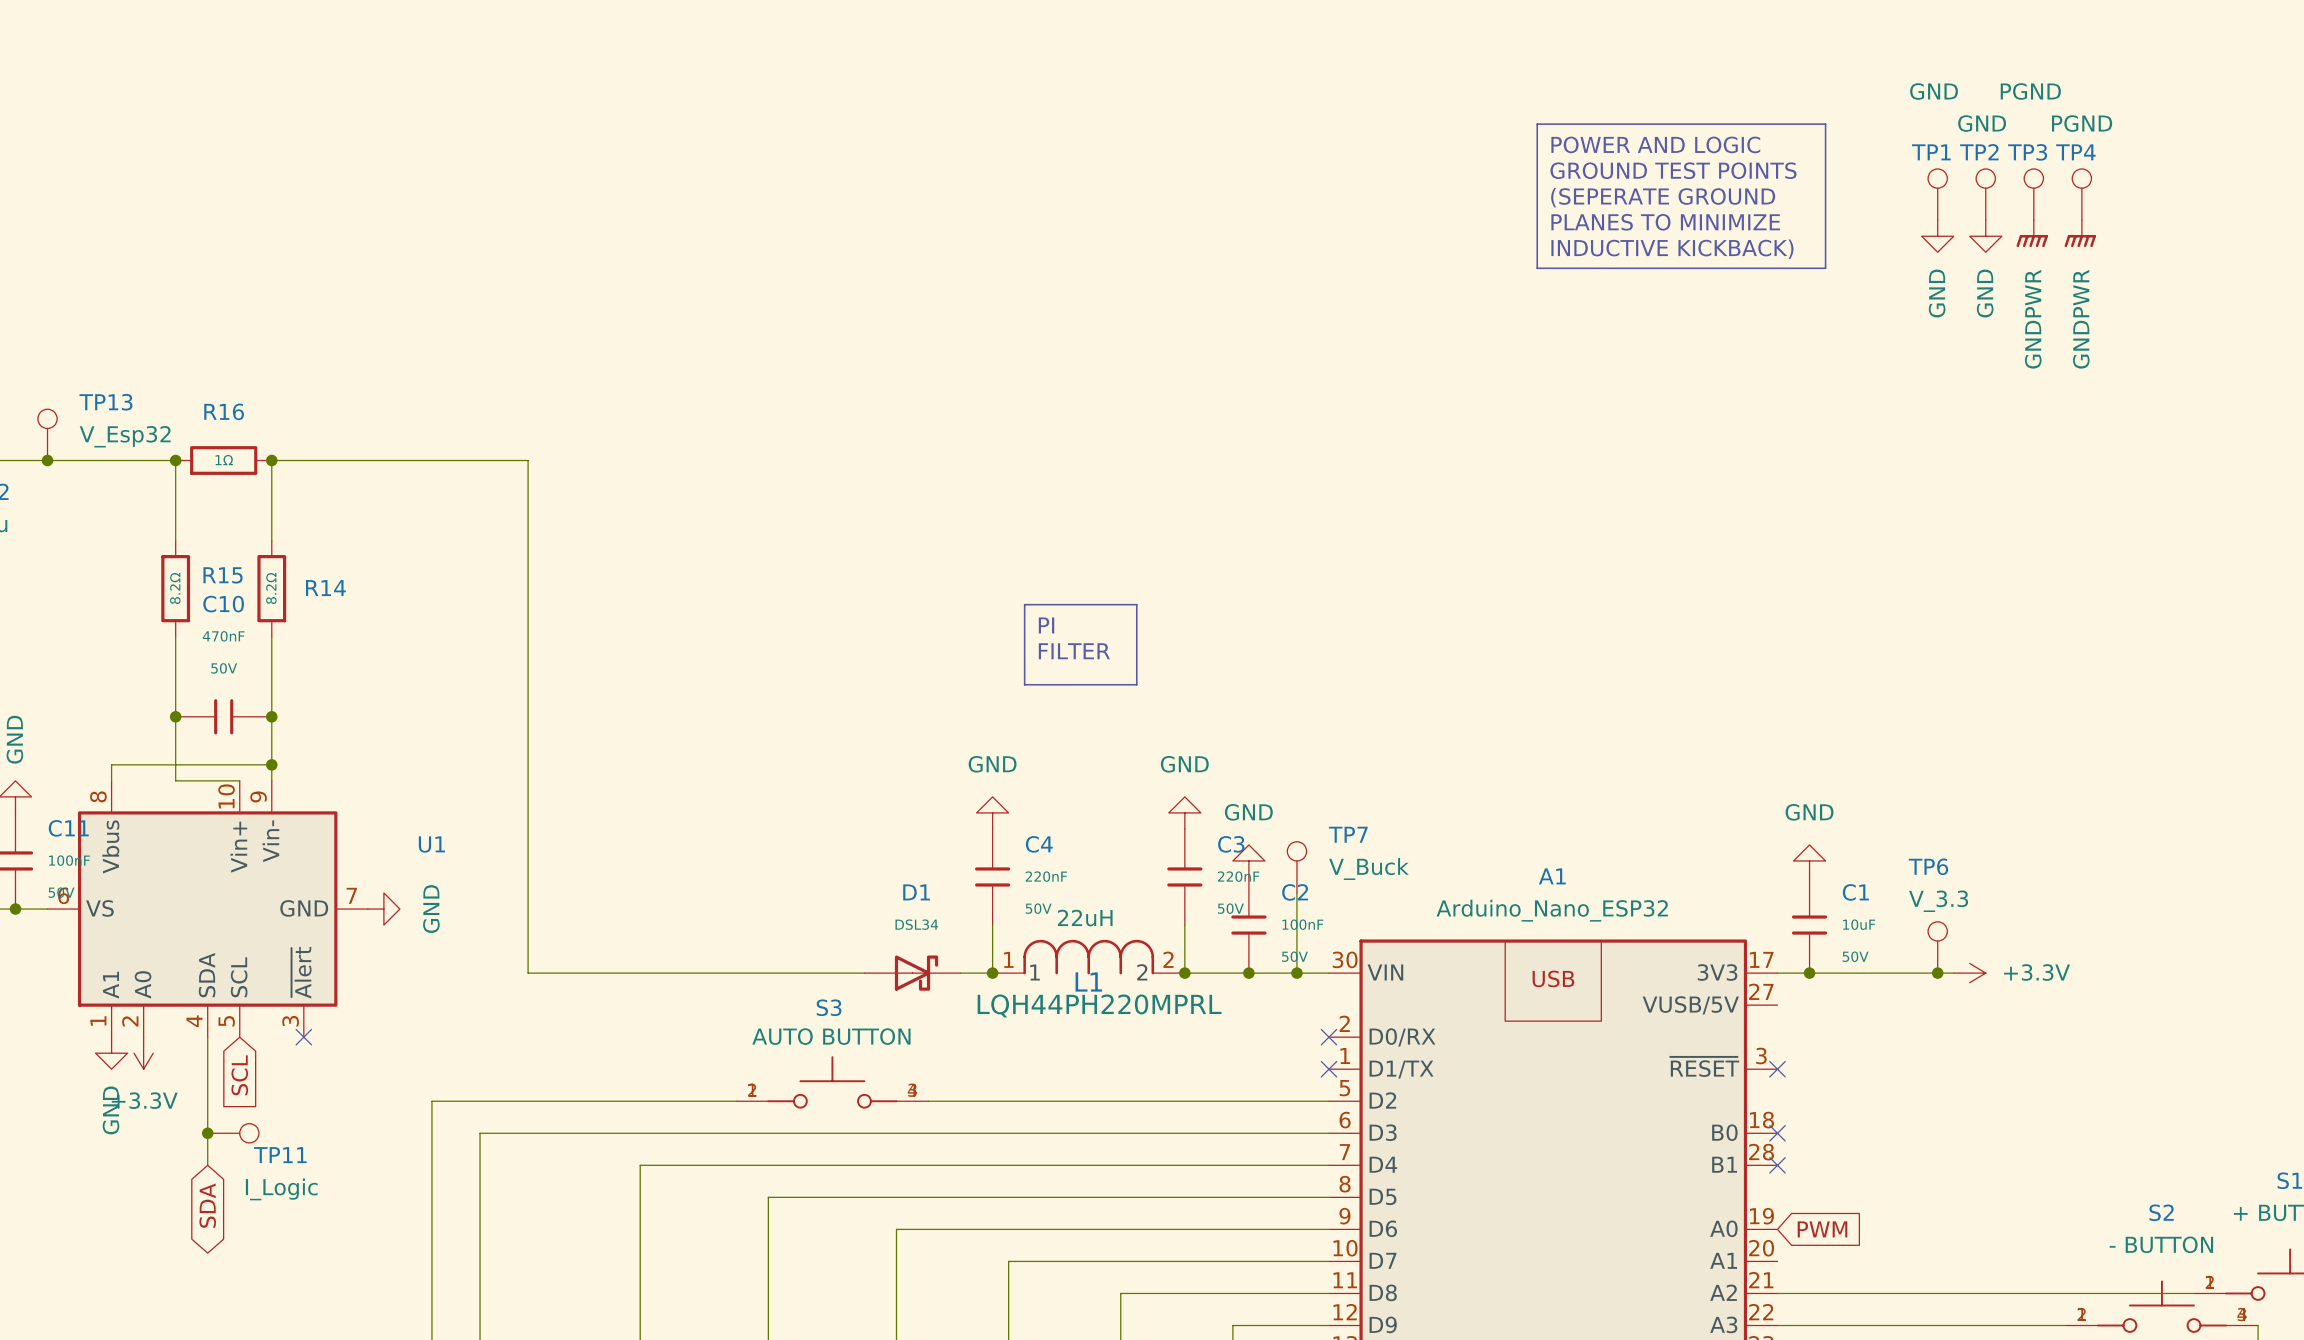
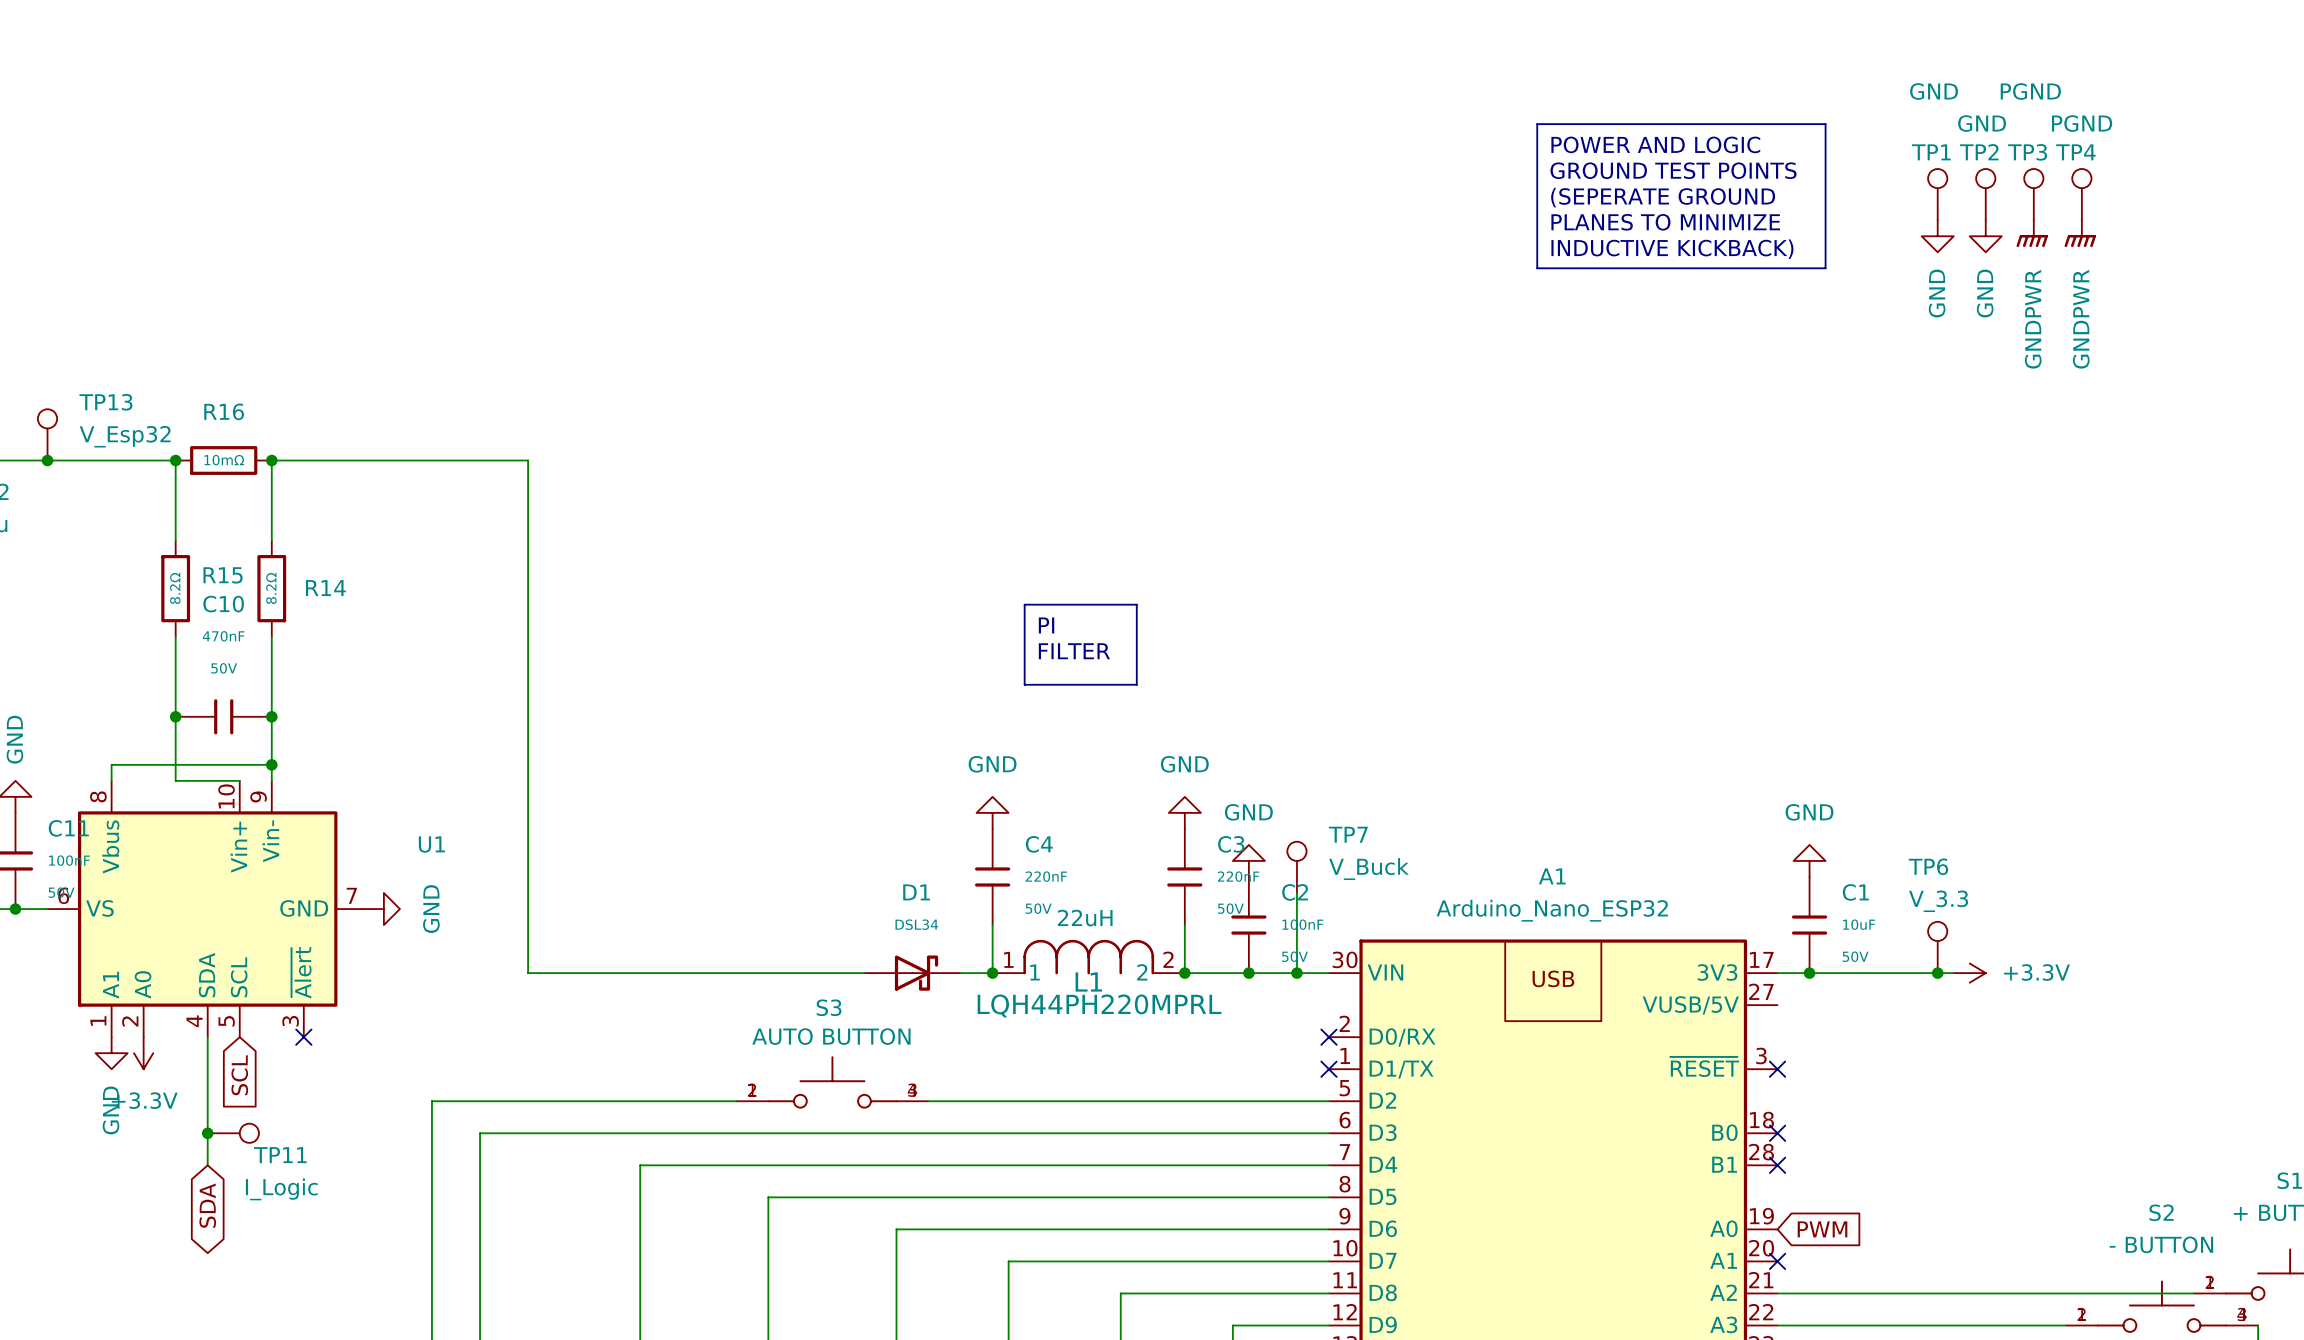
R16 value: 1Ω (224, 460) -> 10mΩ (224, 460)
no-connect mark: none -> (1777, 1261)

